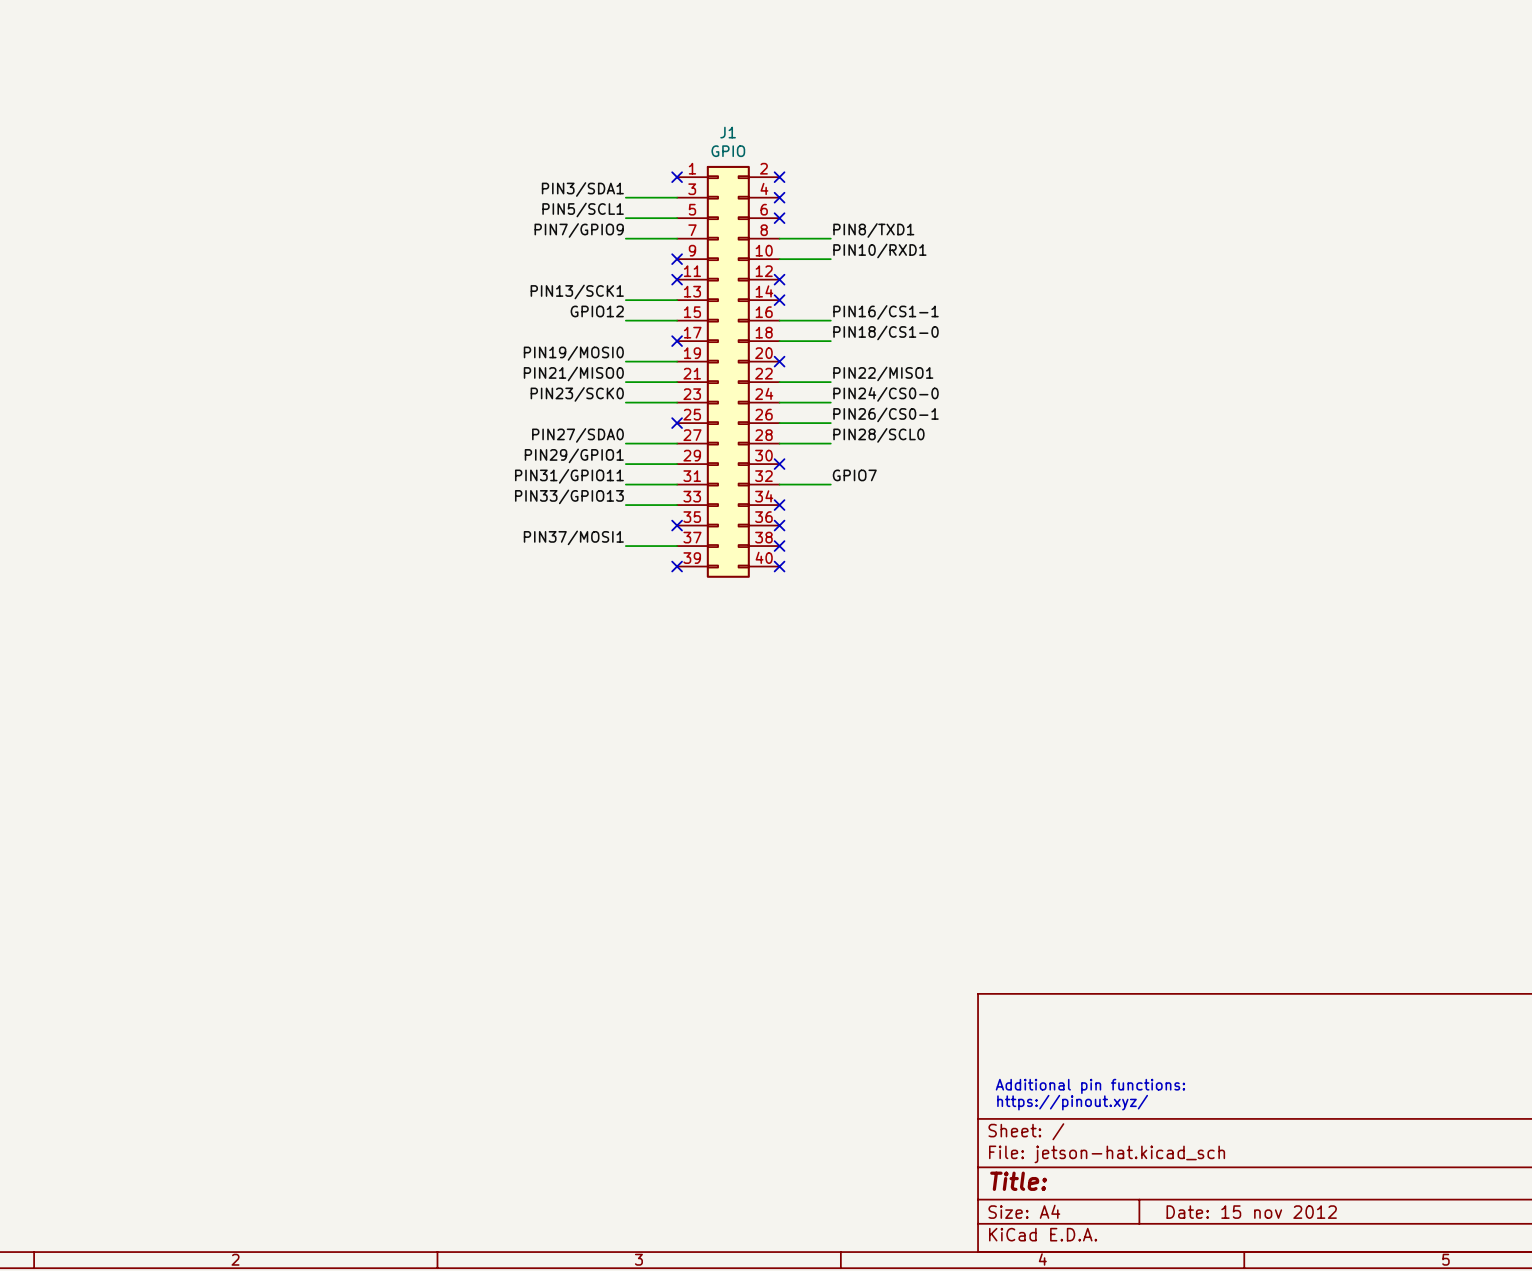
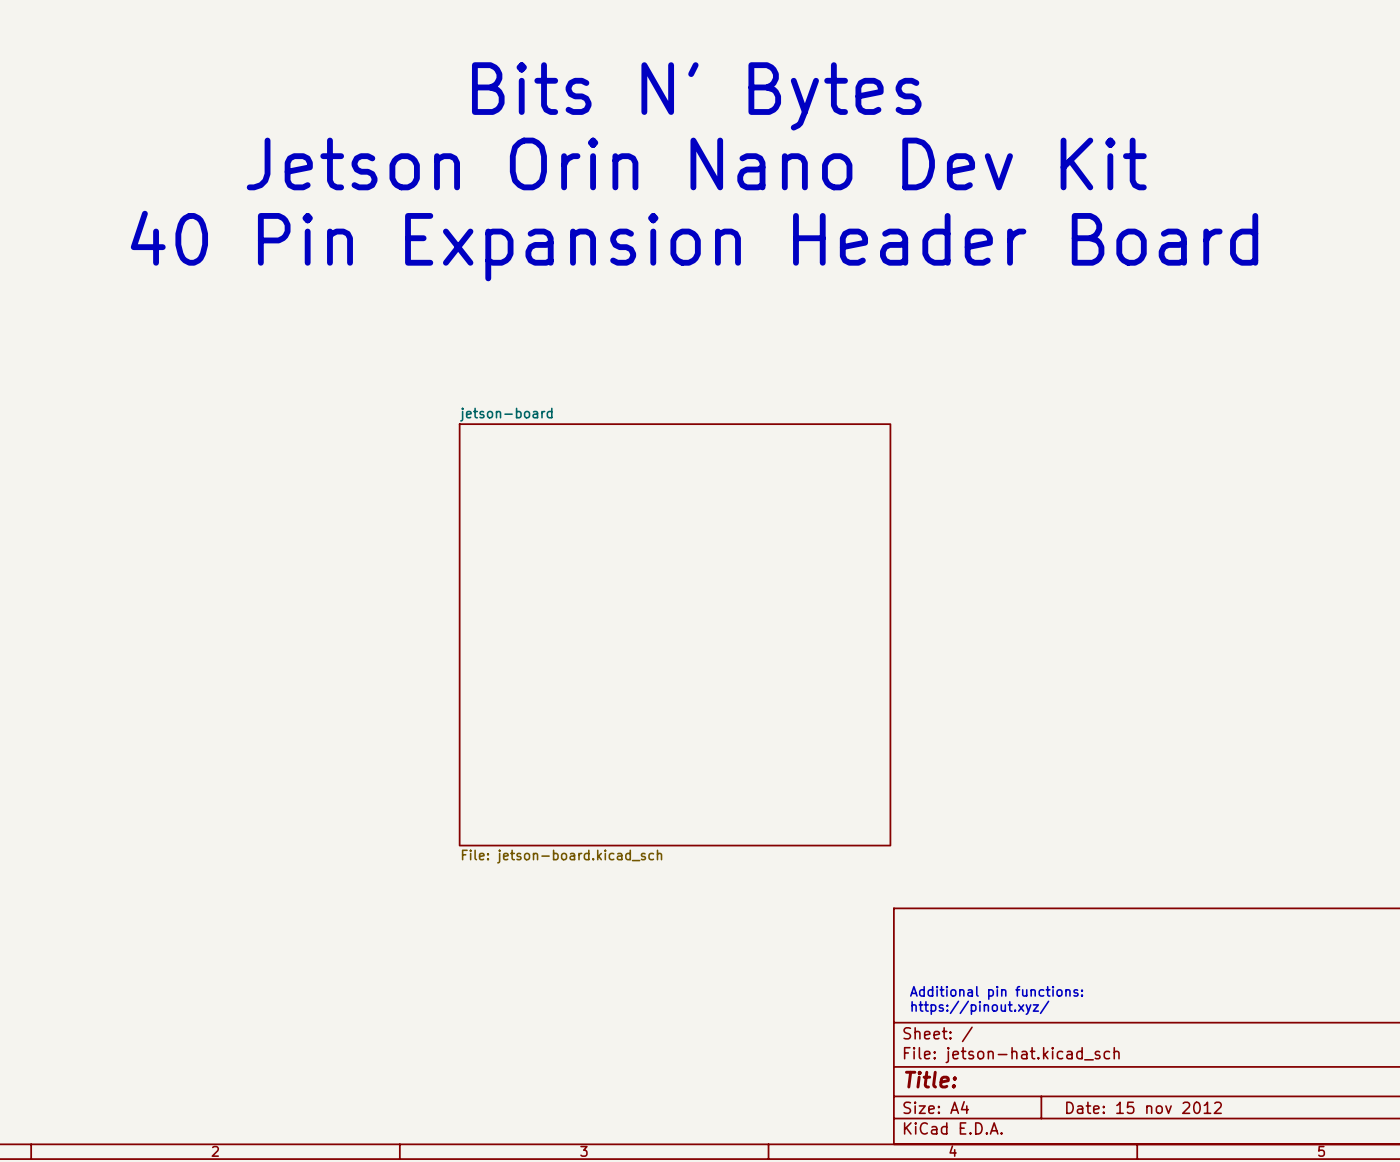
text: none -> Bits N' Bytes (696, 96)
no-connect mark: (677, 177) -> none
no-connect mark: (779, 177) -> none
text: none -> Jetson Orin Nano Dev Kit (696, 163)
label: PIN3/SDA1 (582, 189) -> none
wire: (625, 197) (677, 197) -> none
no-connect mark: (779, 197) -> none
label: PIN5/SCL1 (583, 210) -> none
wire: (625, 218) (677, 218) -> none
no-connect mark: (779, 218) -> none
label: PIN7/GPIO9 (579, 230) -> none
label: PIN8/TXD1 (873, 230) -> none
wire: (625, 238) (677, 238) -> none
wire: (779, 238) (830, 238) -> none
label: PIN10/RXD1 (879, 250) -> none
no-connect mark: (677, 259) -> none
wire: (779, 259) (830, 259) -> none
text: none -> 40 Pin Expansion Header Board (694, 246)
no-connect mark: (677, 279) -> none
no-connect mark: (779, 279) -> none
label: PIN13/SCK1 (577, 291) -> none
wire: (625, 300) (677, 300) -> none
no-connect mark: (779, 300) -> none
label: GPIO12 (597, 311) -> none
label: PIN16/CS1-1 (886, 312) -> none
wire: (625, 320) (677, 320) -> none
wire: (779, 320) (830, 320) -> none
label: PIN18/CS1-0 (886, 332) -> none
no-connect mark: (677, 341) -> none
wire: (779, 341) (830, 341) -> none
label: PIN19/MOSI0 (573, 353) -> none
wire: (625, 361) (677, 361) -> none
no-connect mark: (779, 361) -> none
J1: GPIO (728, 371) -> none
label: PIN21/MISO0 (573, 373) -> none
label: PIN22/MISO1 (883, 373) -> none
wire: (625, 382) (677, 382) -> none
wire: (779, 382) (830, 382) -> none
label: PIN23/SCK0 (577, 394) -> none
label: PIN24/CS0-0 (886, 394) -> none
wire: (625, 402) (677, 402) -> none
wire: (779, 402) (830, 402) -> none
label: PIN26/CS0-1 (886, 414) -> none
no-connect mark: (677, 423) -> none
wire: (779, 423) (830, 423) -> none
label: PIN27/SDA0 (577, 435) -> none
label: PIN28/SCL0 (878, 435) -> none
wire: (625, 443) (677, 443) -> none
wire: (779, 443) (830, 443) -> none
label: PIN29/GPIO1 (574, 455) -> none
no-connect mark: (779, 464) -> none
label: GPIO7 (854, 475) -> none
label: PIN31/GPIO11 (569, 476) -> none
wire: (625, 484) (677, 484) -> none
wire: (779, 484) (830, 484) -> none
label: PIN33/GPIO13 (569, 496) -> none
wire: (625, 505) (677, 505) -> none
no-connect mark: (779, 505) -> none
no-connect mark: (677, 525) -> none
no-connect mark: (779, 525) -> none
label: PIN37/MOSI1 (573, 537) -> none
wire: (625, 546) (677, 546) -> none
no-connect mark: (779, 546) -> none
no-connect mark: (677, 566) -> none
no-connect mark: (779, 566) -> none
sheet jetson-board: none -> File: jetson-board.kicad_sch (675, 634)

